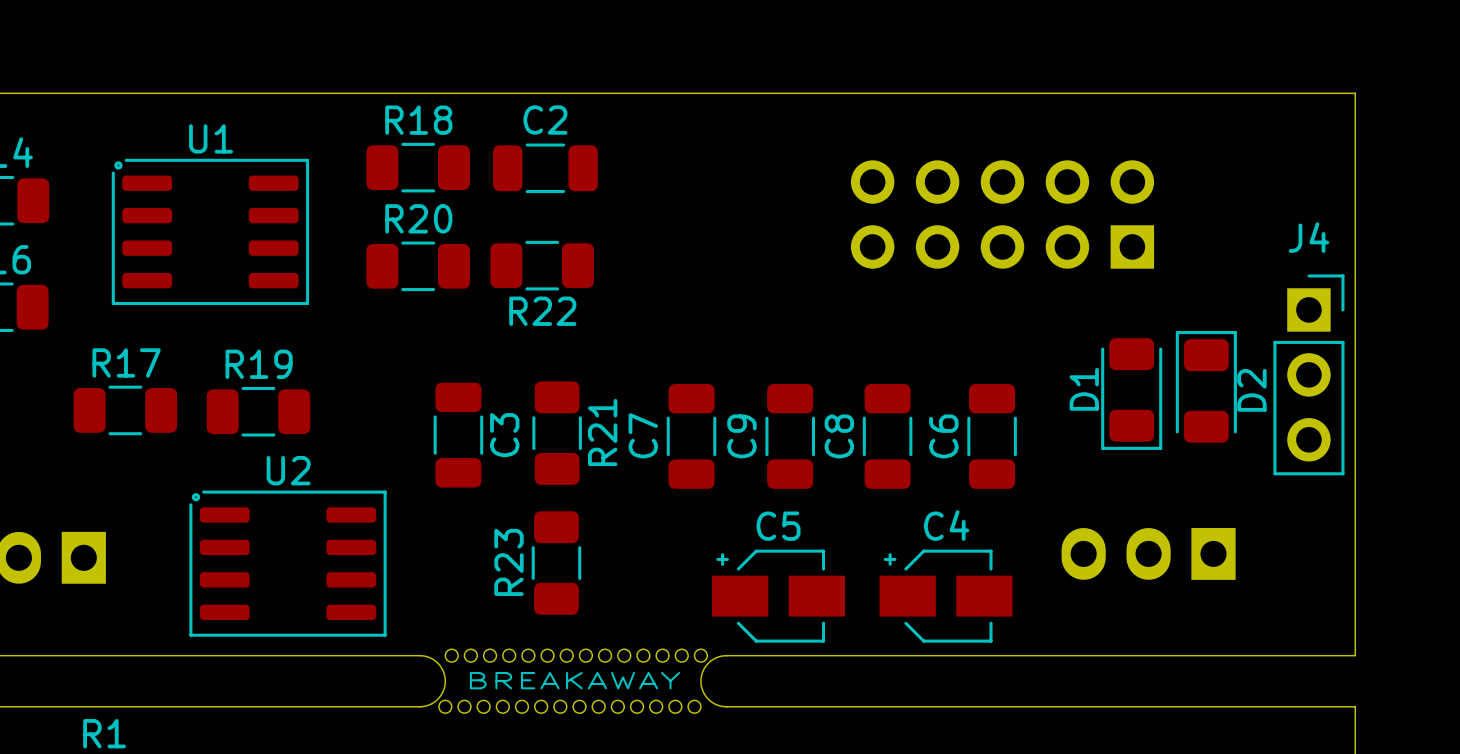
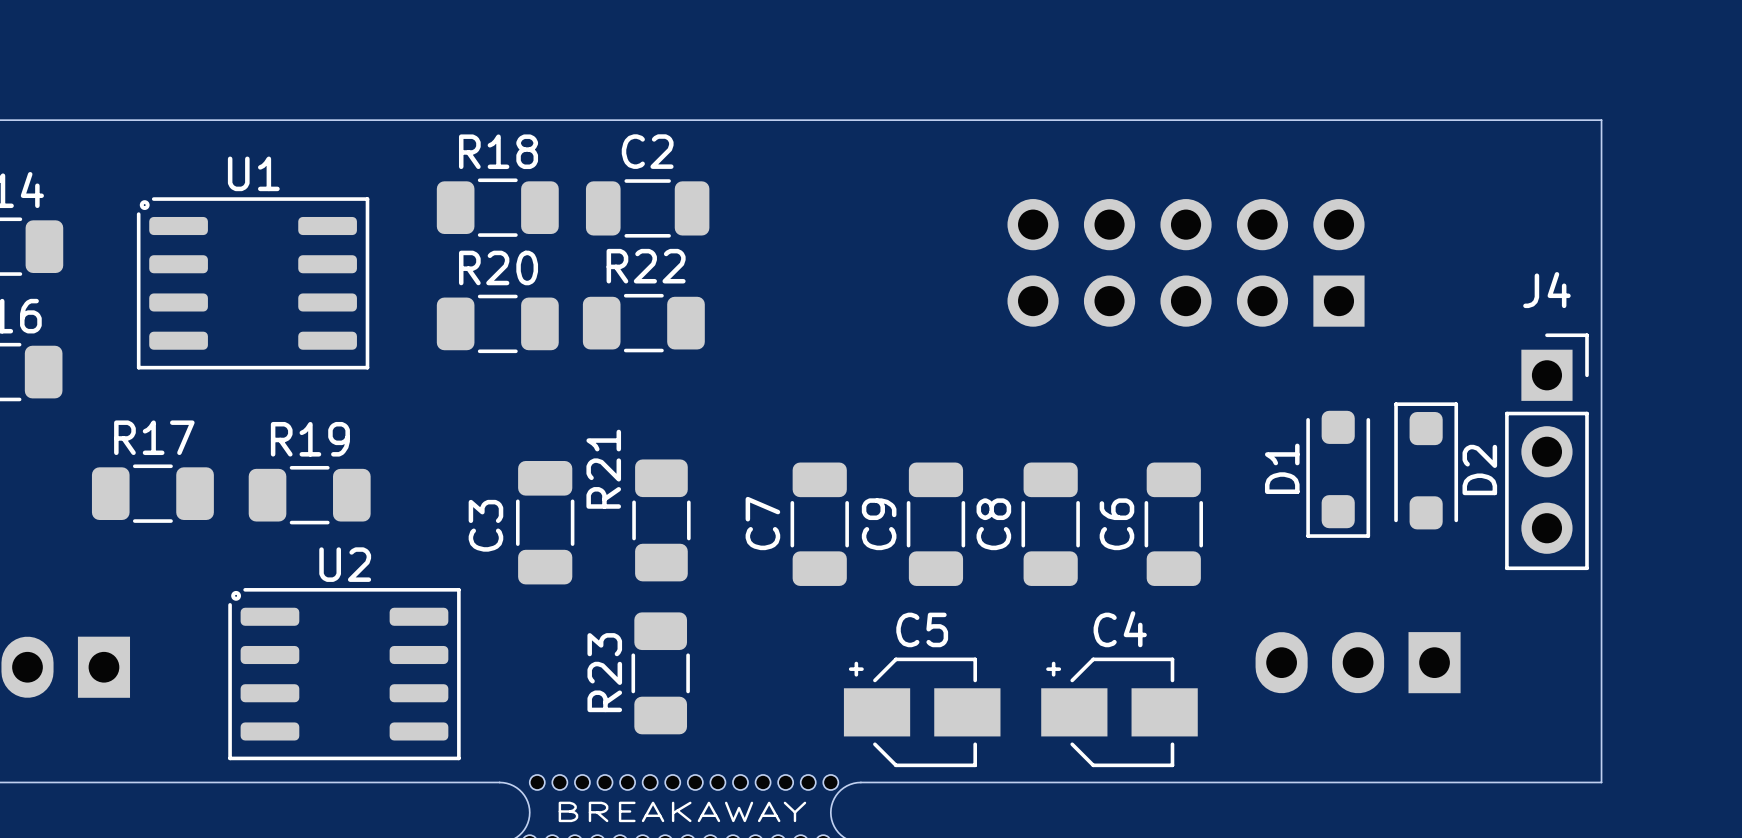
R22 name position: R22 (542, 311) -> R22 (646, 266)
D2 footprint: [1175, 331, 1237, 443] -> [1394, 402, 1459, 530]
D1 footprint: [1101, 338, 1163, 450] -> [1306, 410, 1371, 538]
R21 name position: R21 (602, 432) -> R21 (603, 469)
C3 name position: C3 (504, 435) -> C3 (485, 525)

